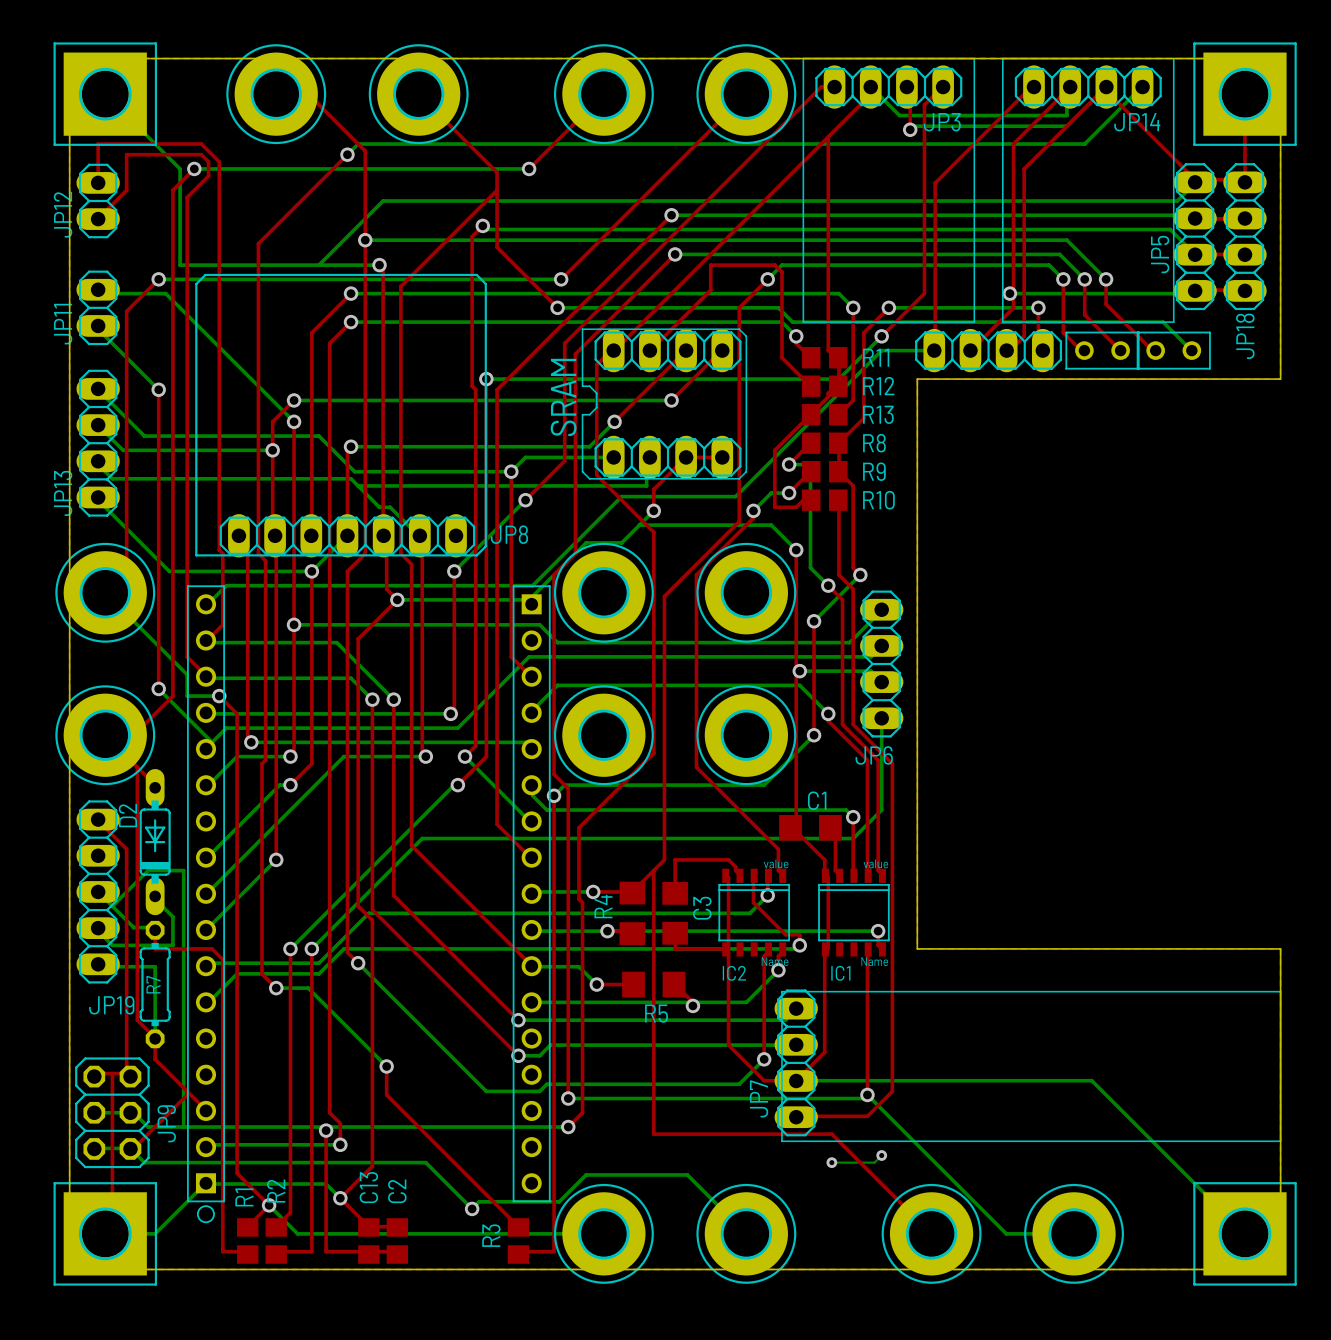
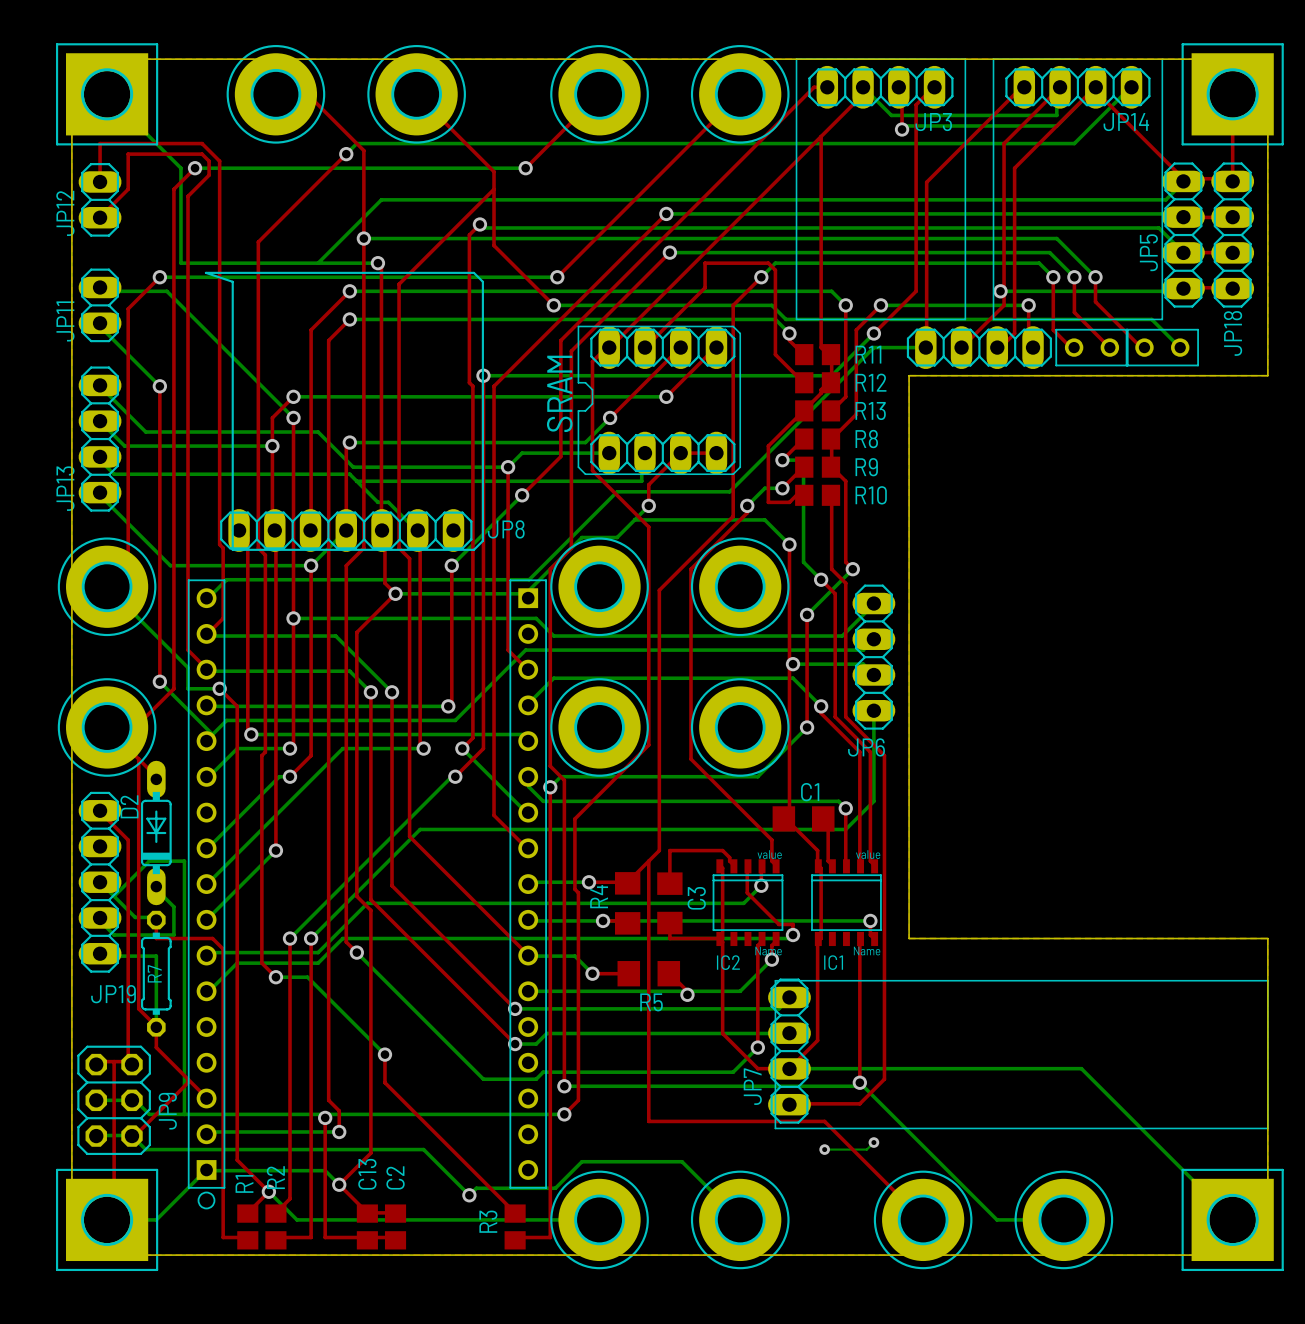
line: (205, 274) (196, 283) (196, 555) (232, 555) -> (205, 272) (232, 281) (232, 549)

